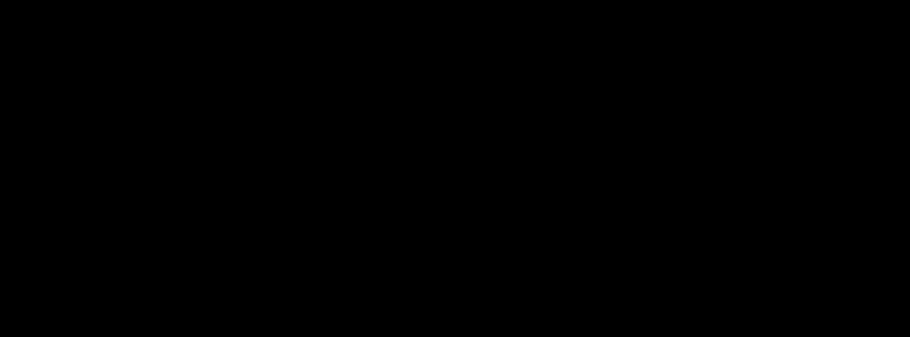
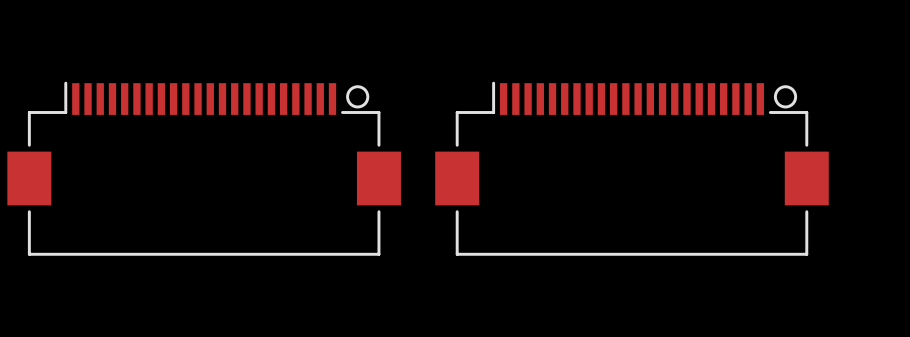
part: none -> (204, 168)
part: none -> (631, 168)

